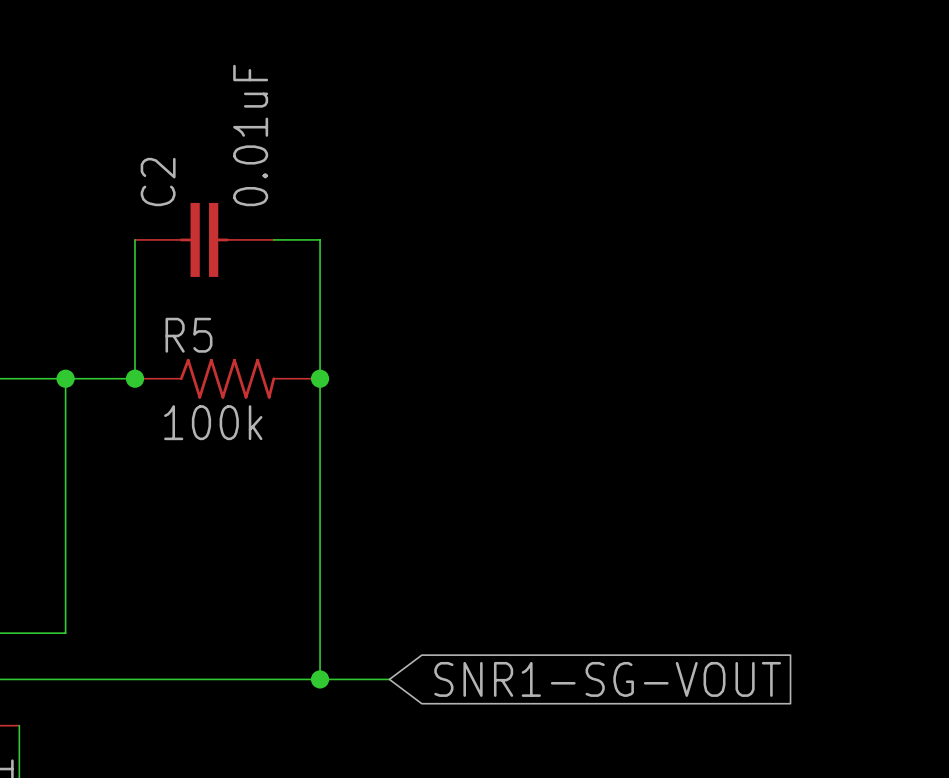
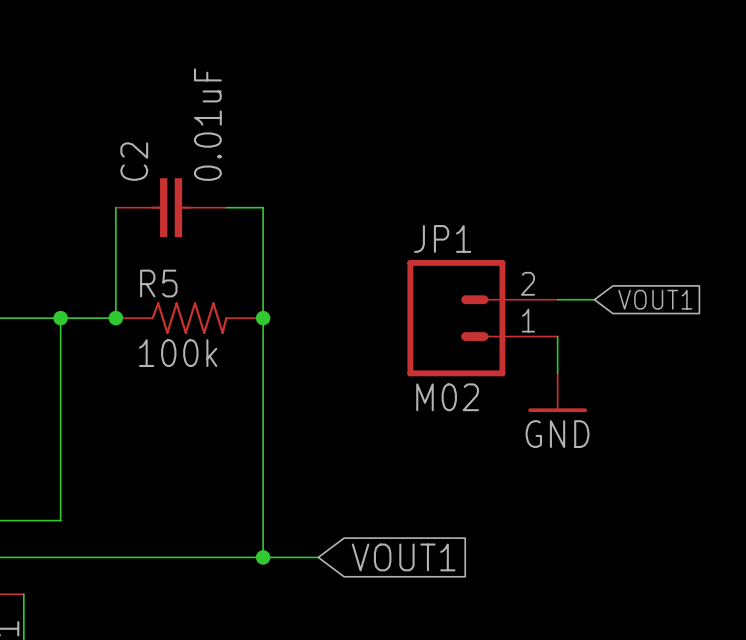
wire: none -> (557, 299) (594, 299)
global label: none -> VOUT1 (655, 299)
JP1: none -> M02 (482, 318)
wire: none -> (557, 336) (557, 373)
power symbol: none -> GND (557, 392)
global label: SNR1-SG-VOUT (607, 679) -> VOUT1 (403, 557)

